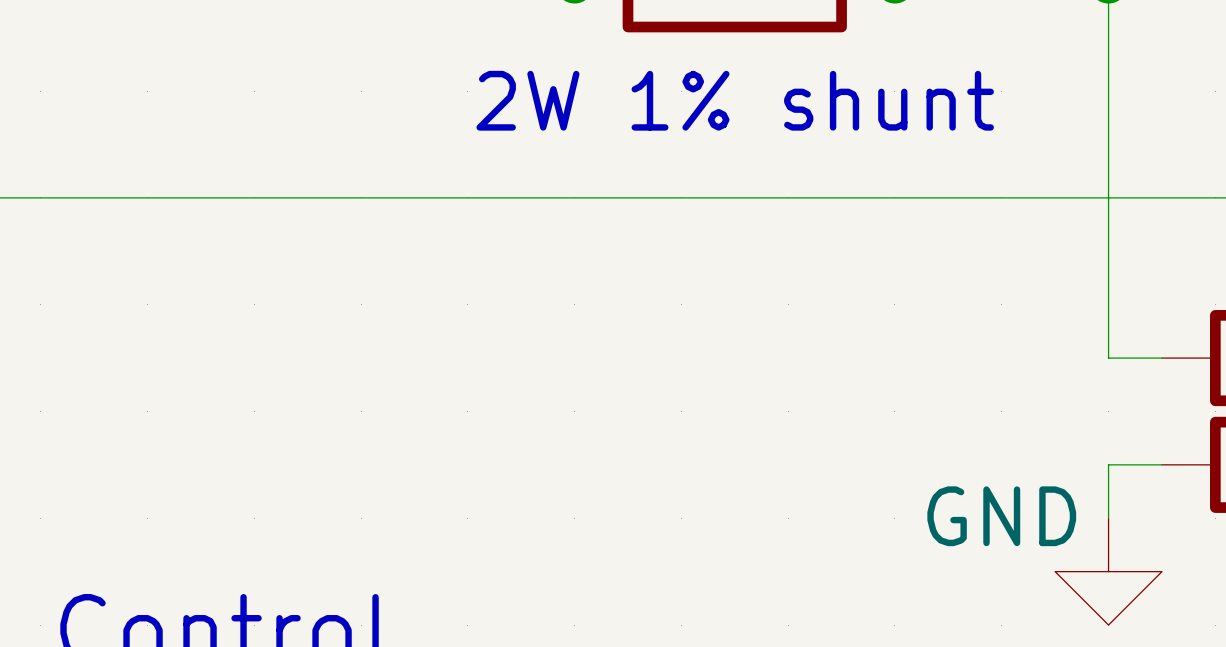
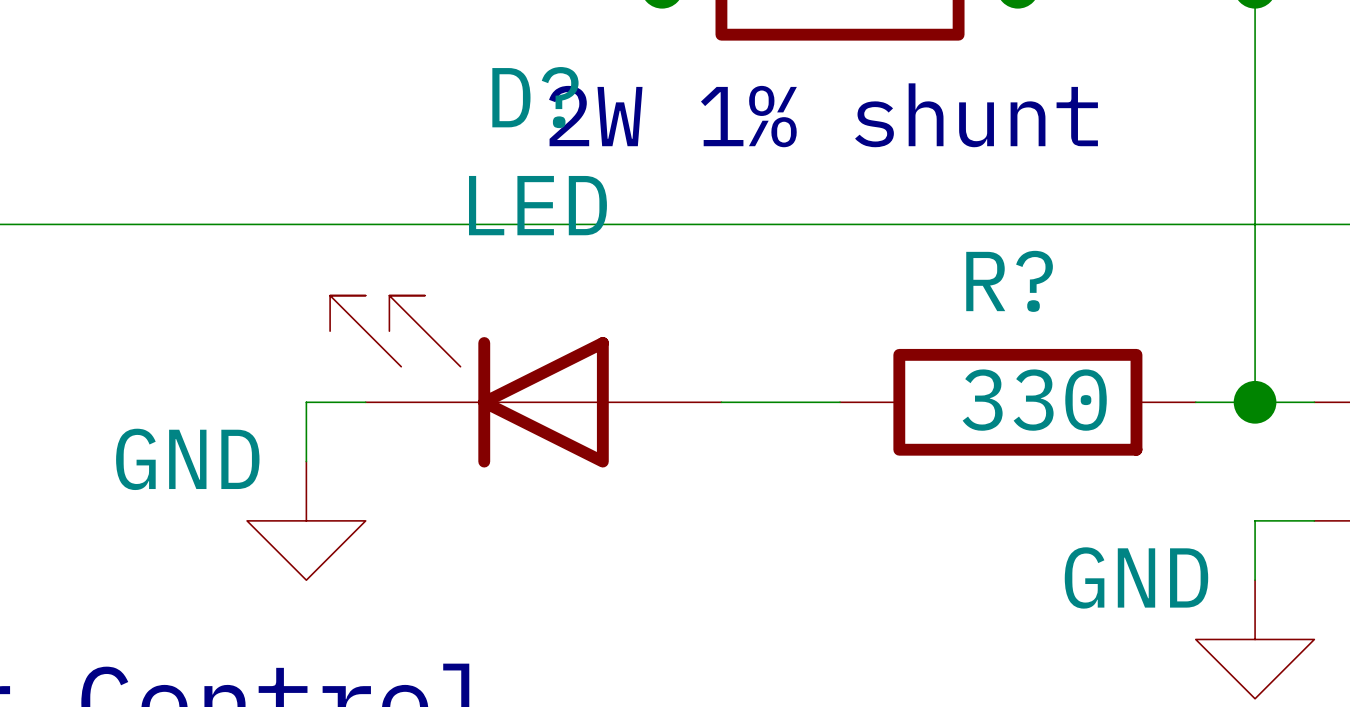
D?: none -> LED (525, 381)
wire: none -> (365, 402) (306, 402) (306, 461)
wire: none -> (721, 402) (840, 402)
R?: none -> 330 (1017, 402)
wire: none -> (1195, 402) (1255, 402)
junction: none -> (1255, 402)
power symbol: none -> GND (306, 520)

